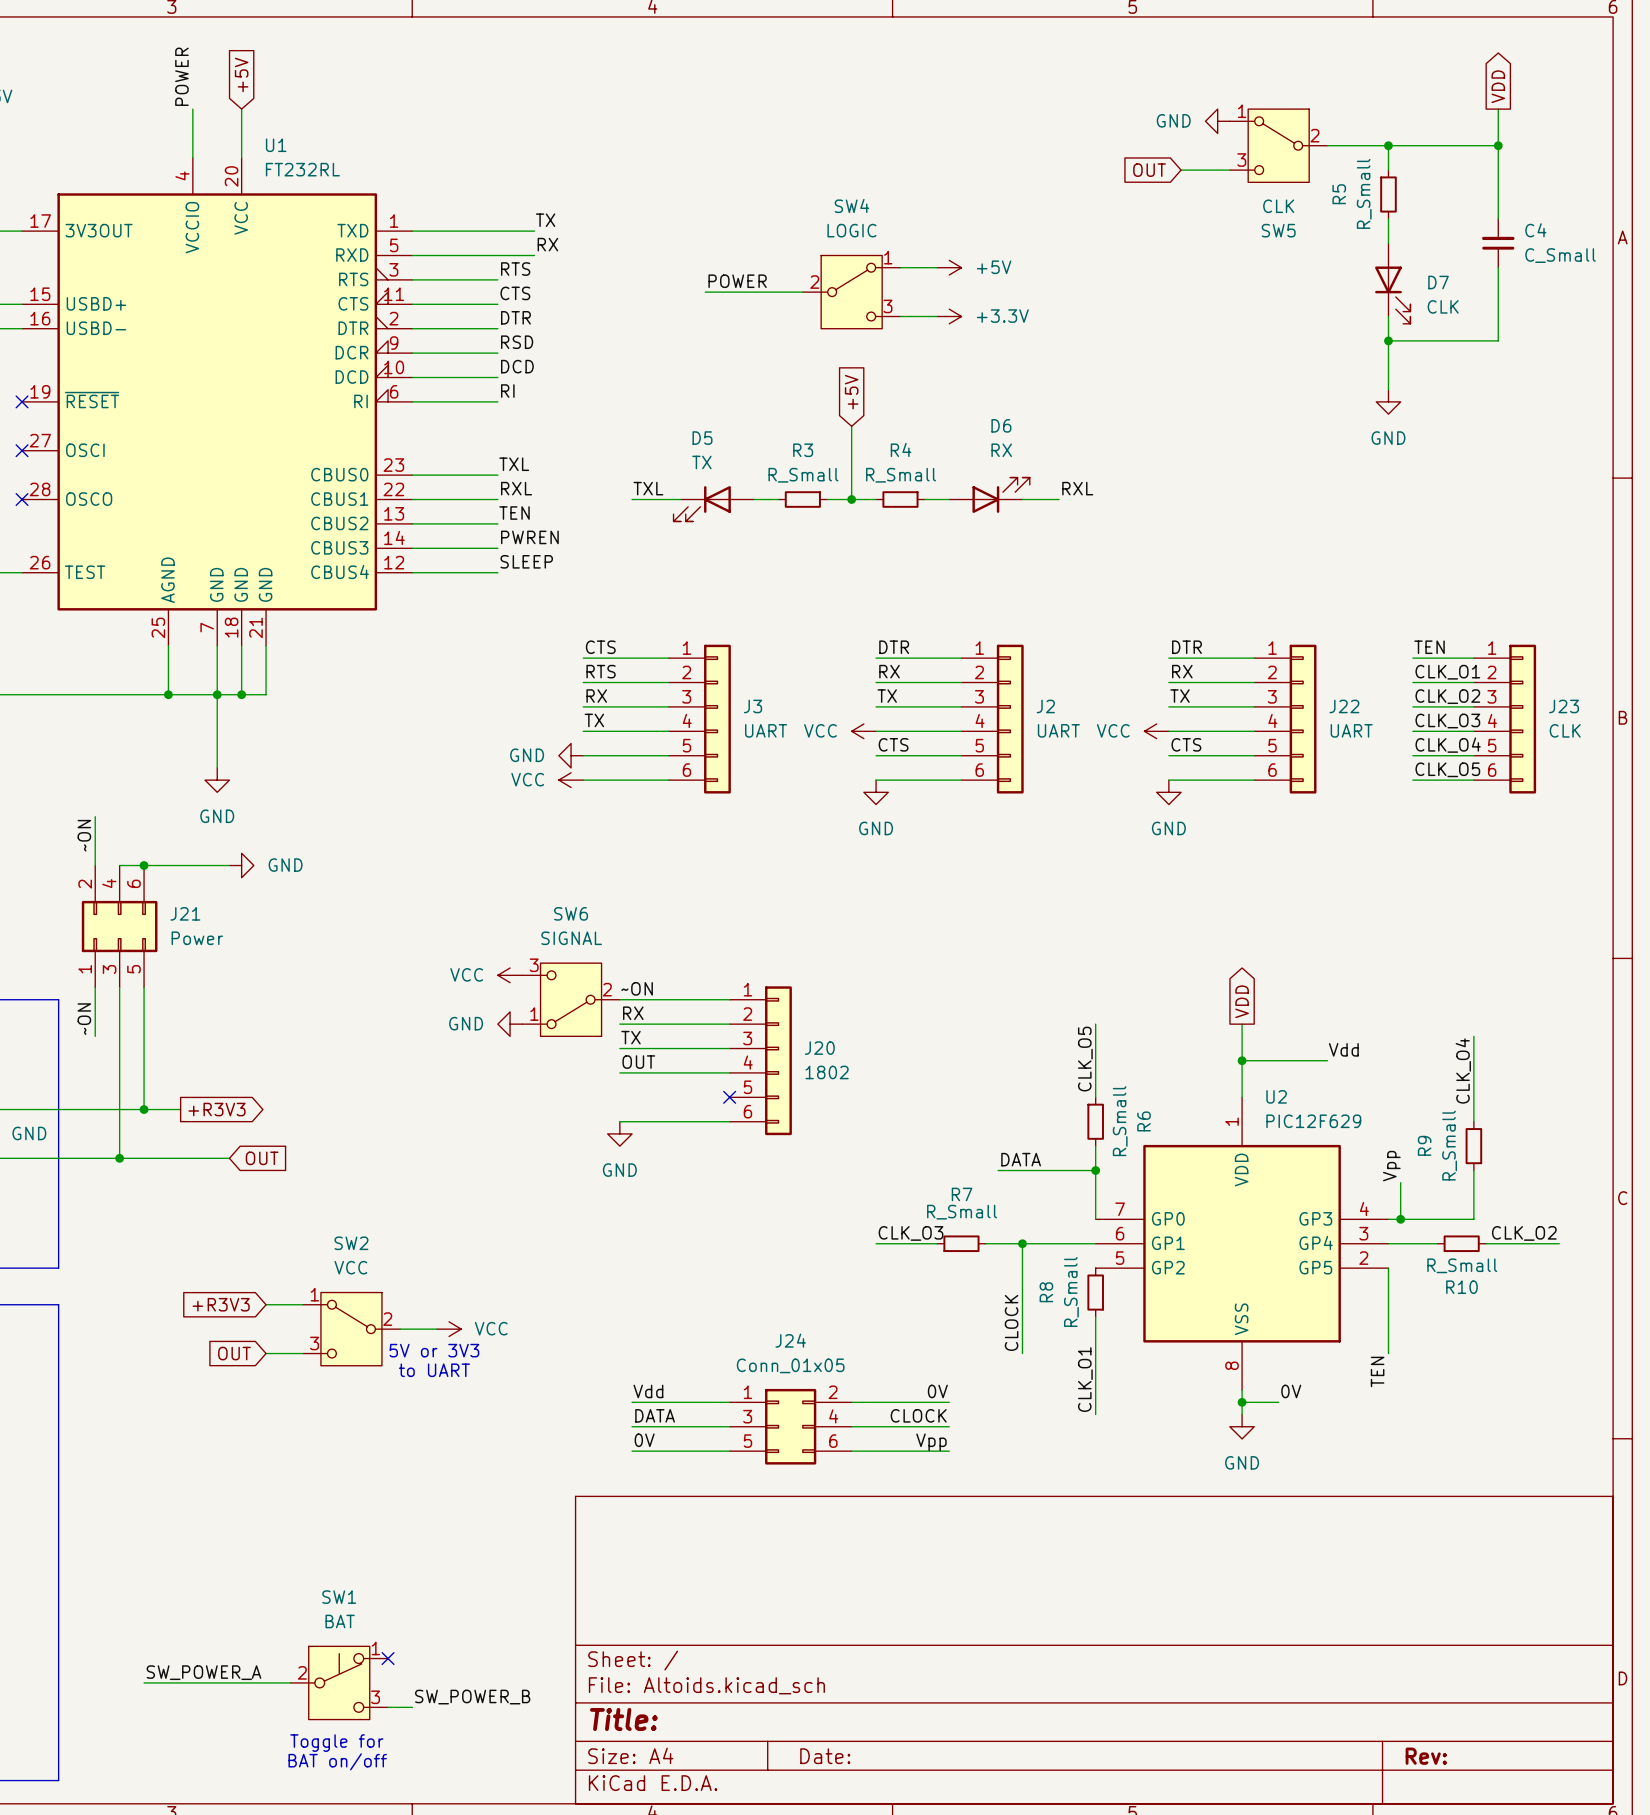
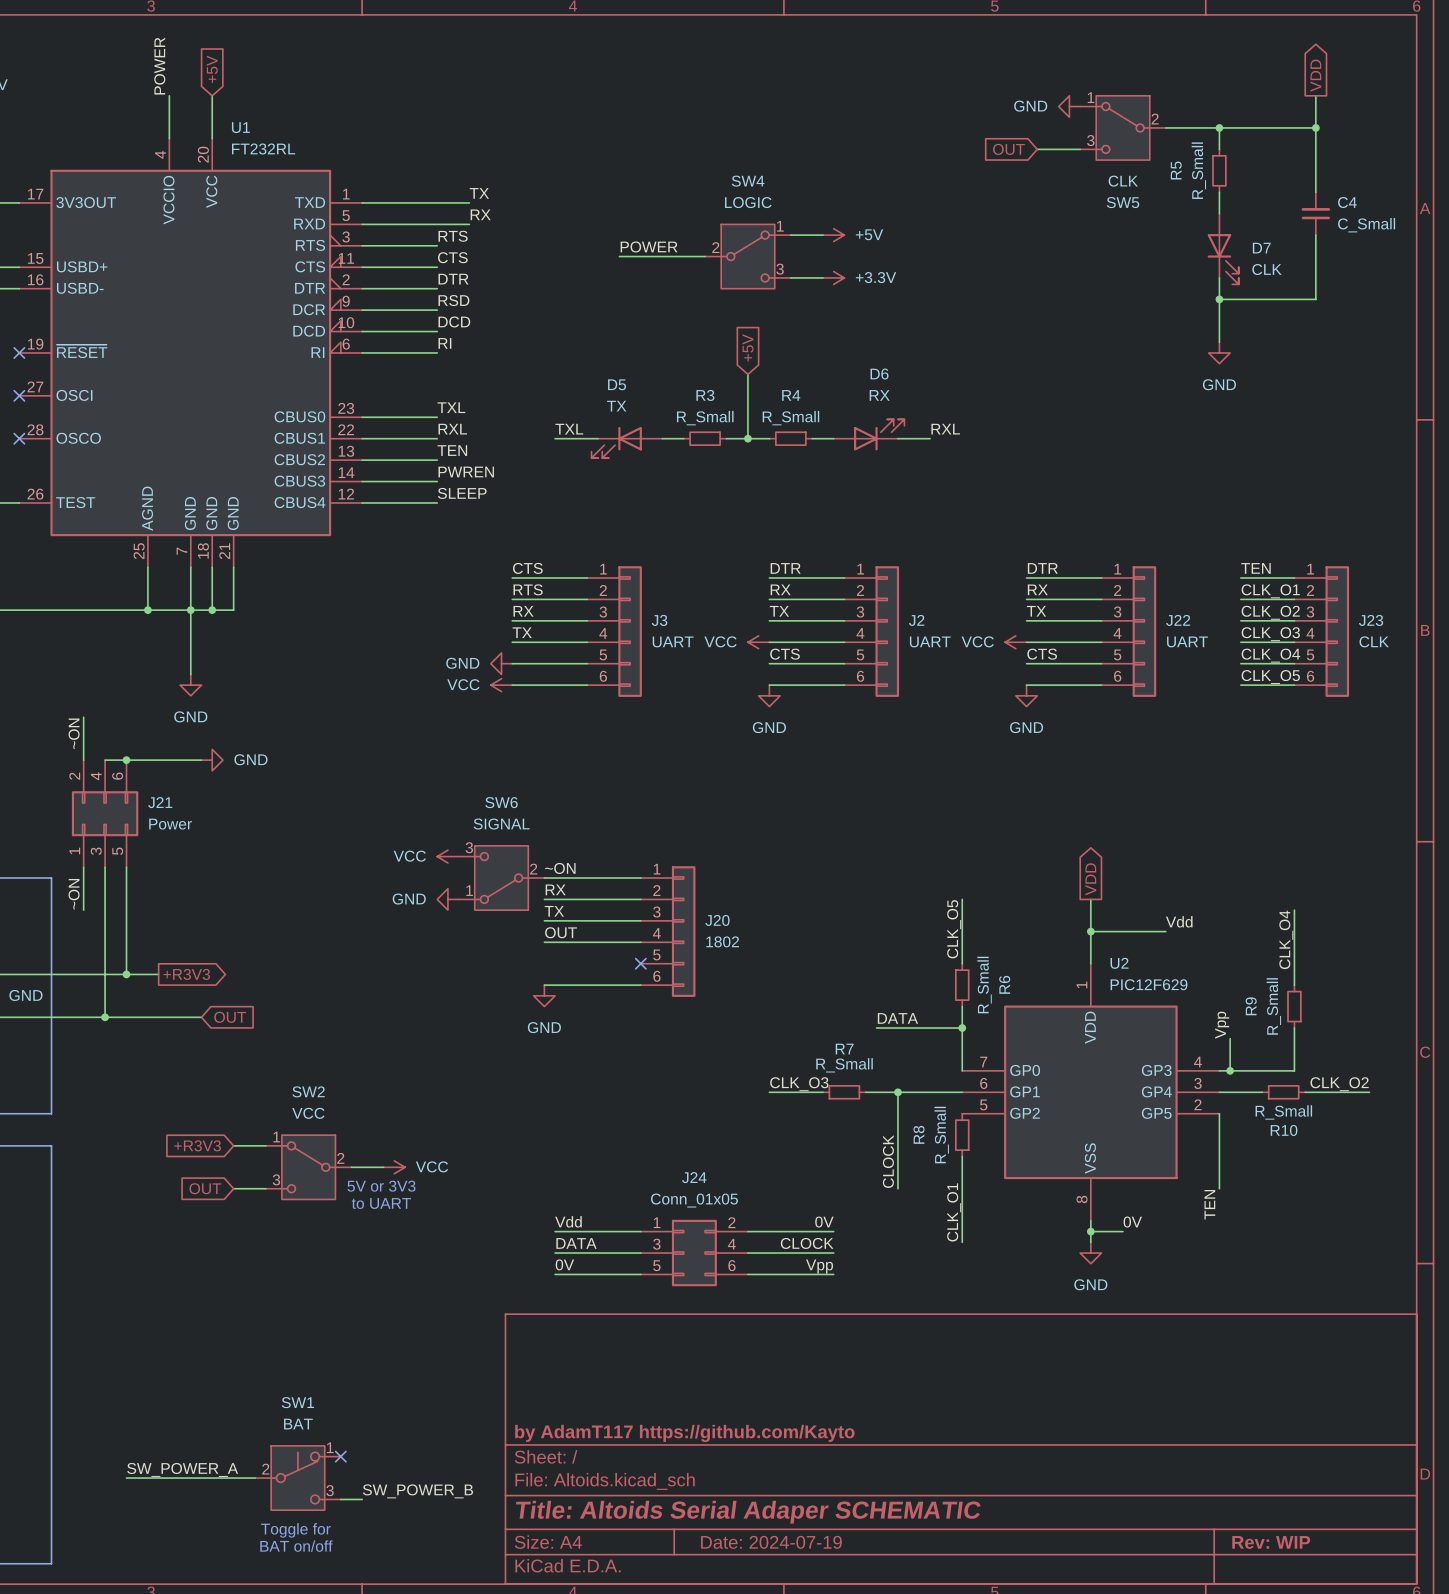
title block: none -> by AdamT117 https://github.com/Kayto (684, 1433)
title block: Title: (623, 1719) -> Title: Altoids Serial Adaper SCHEMATIC (748, 1512)
title block: Date: (825, 1756) -> Date: 2024-07-19 (771, 1542)
title block: Rev: (1426, 1756) -> Rev: WIP (1271, 1542)

